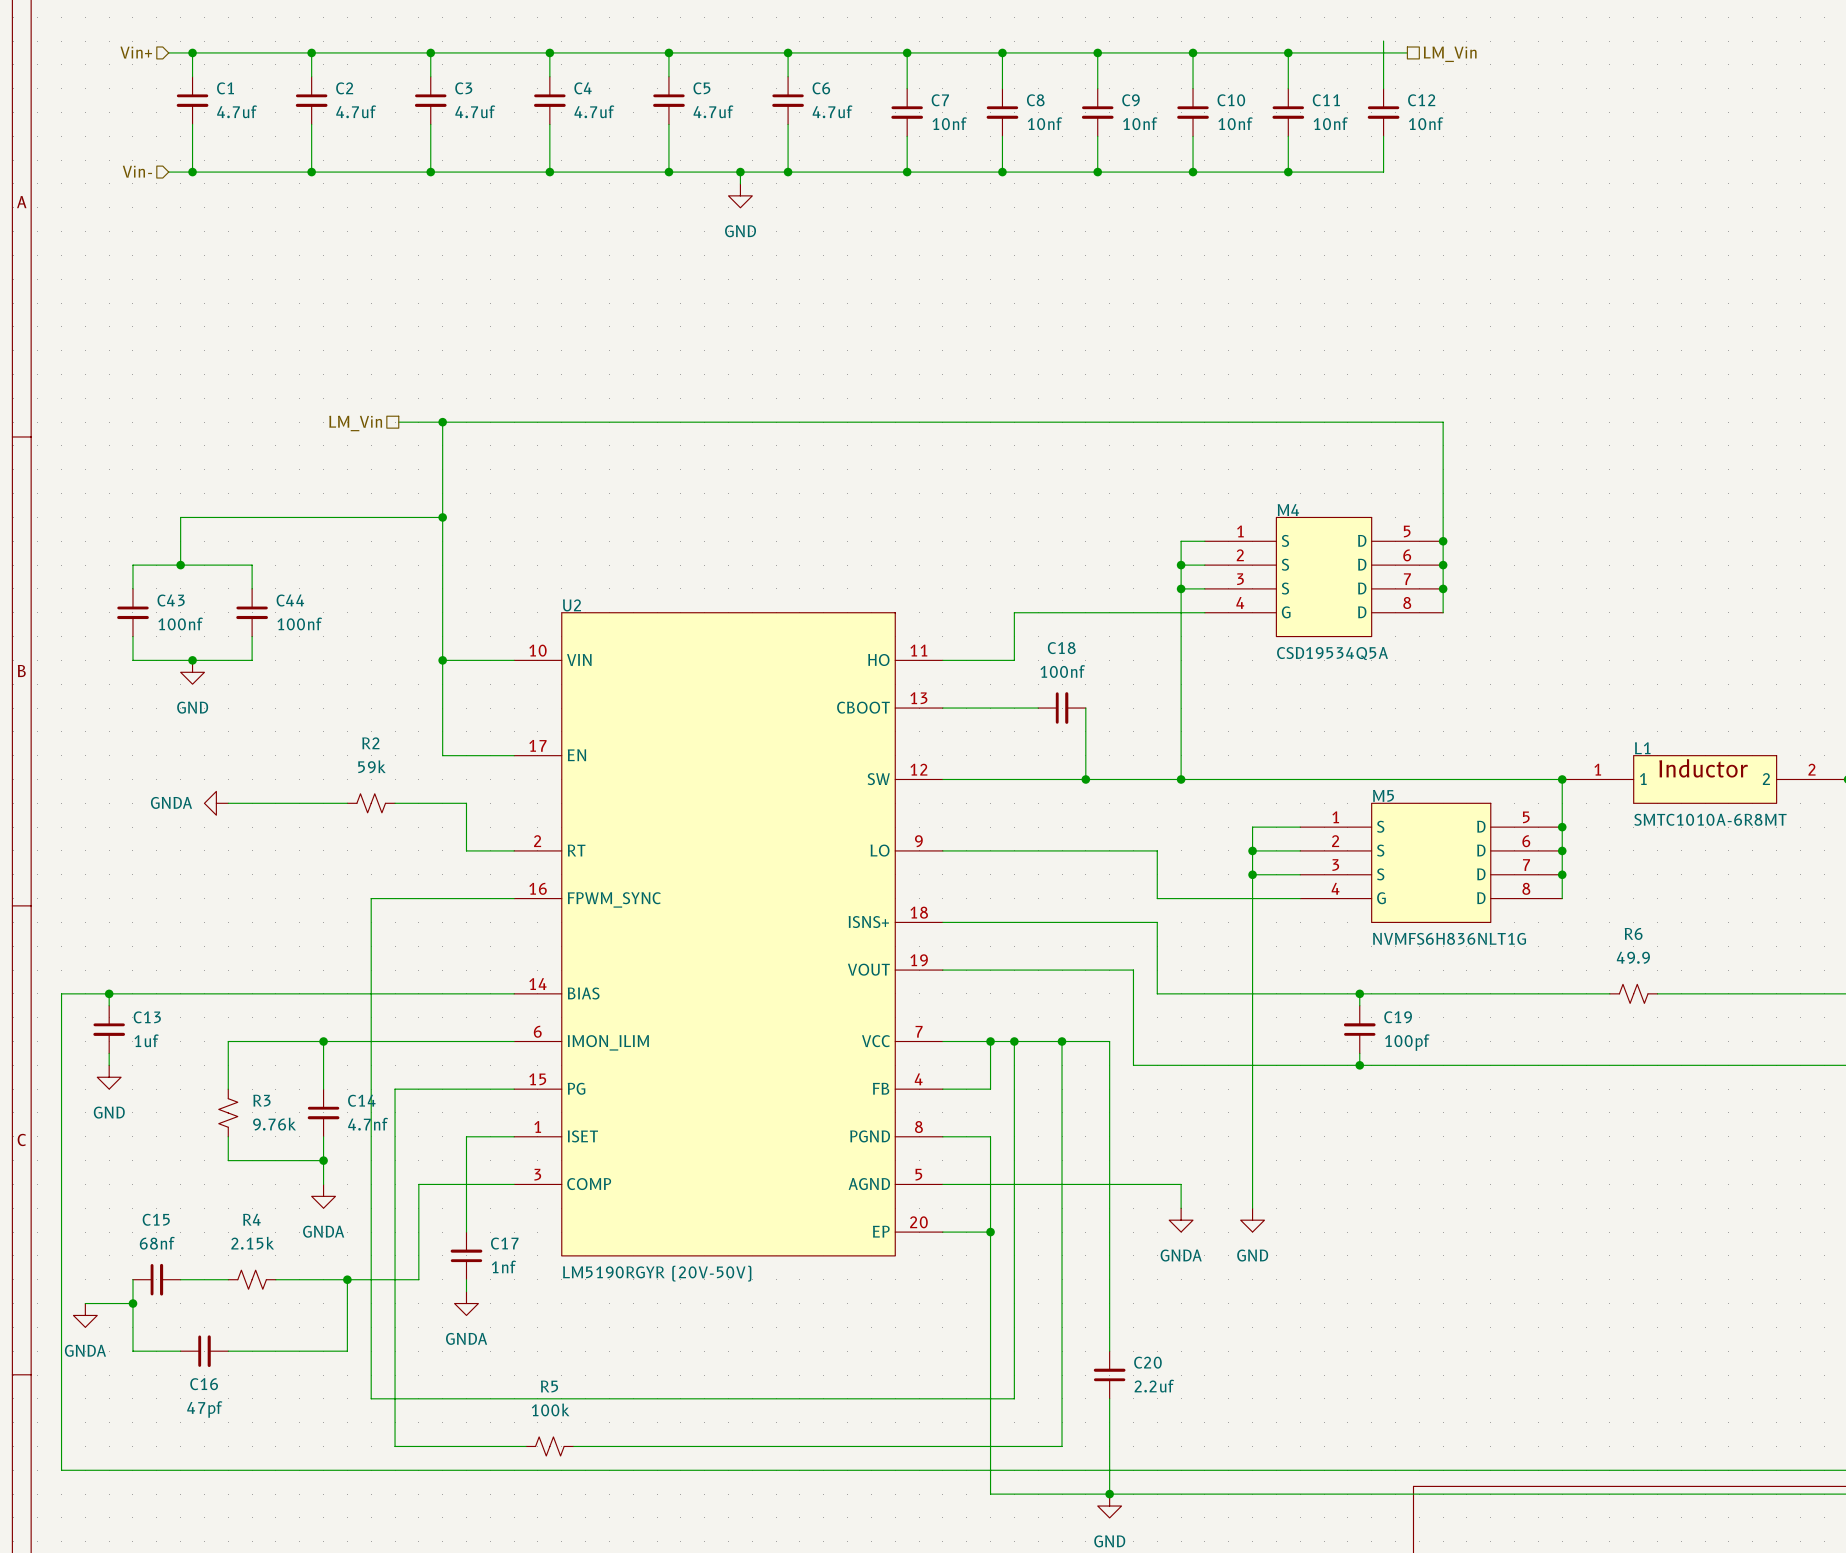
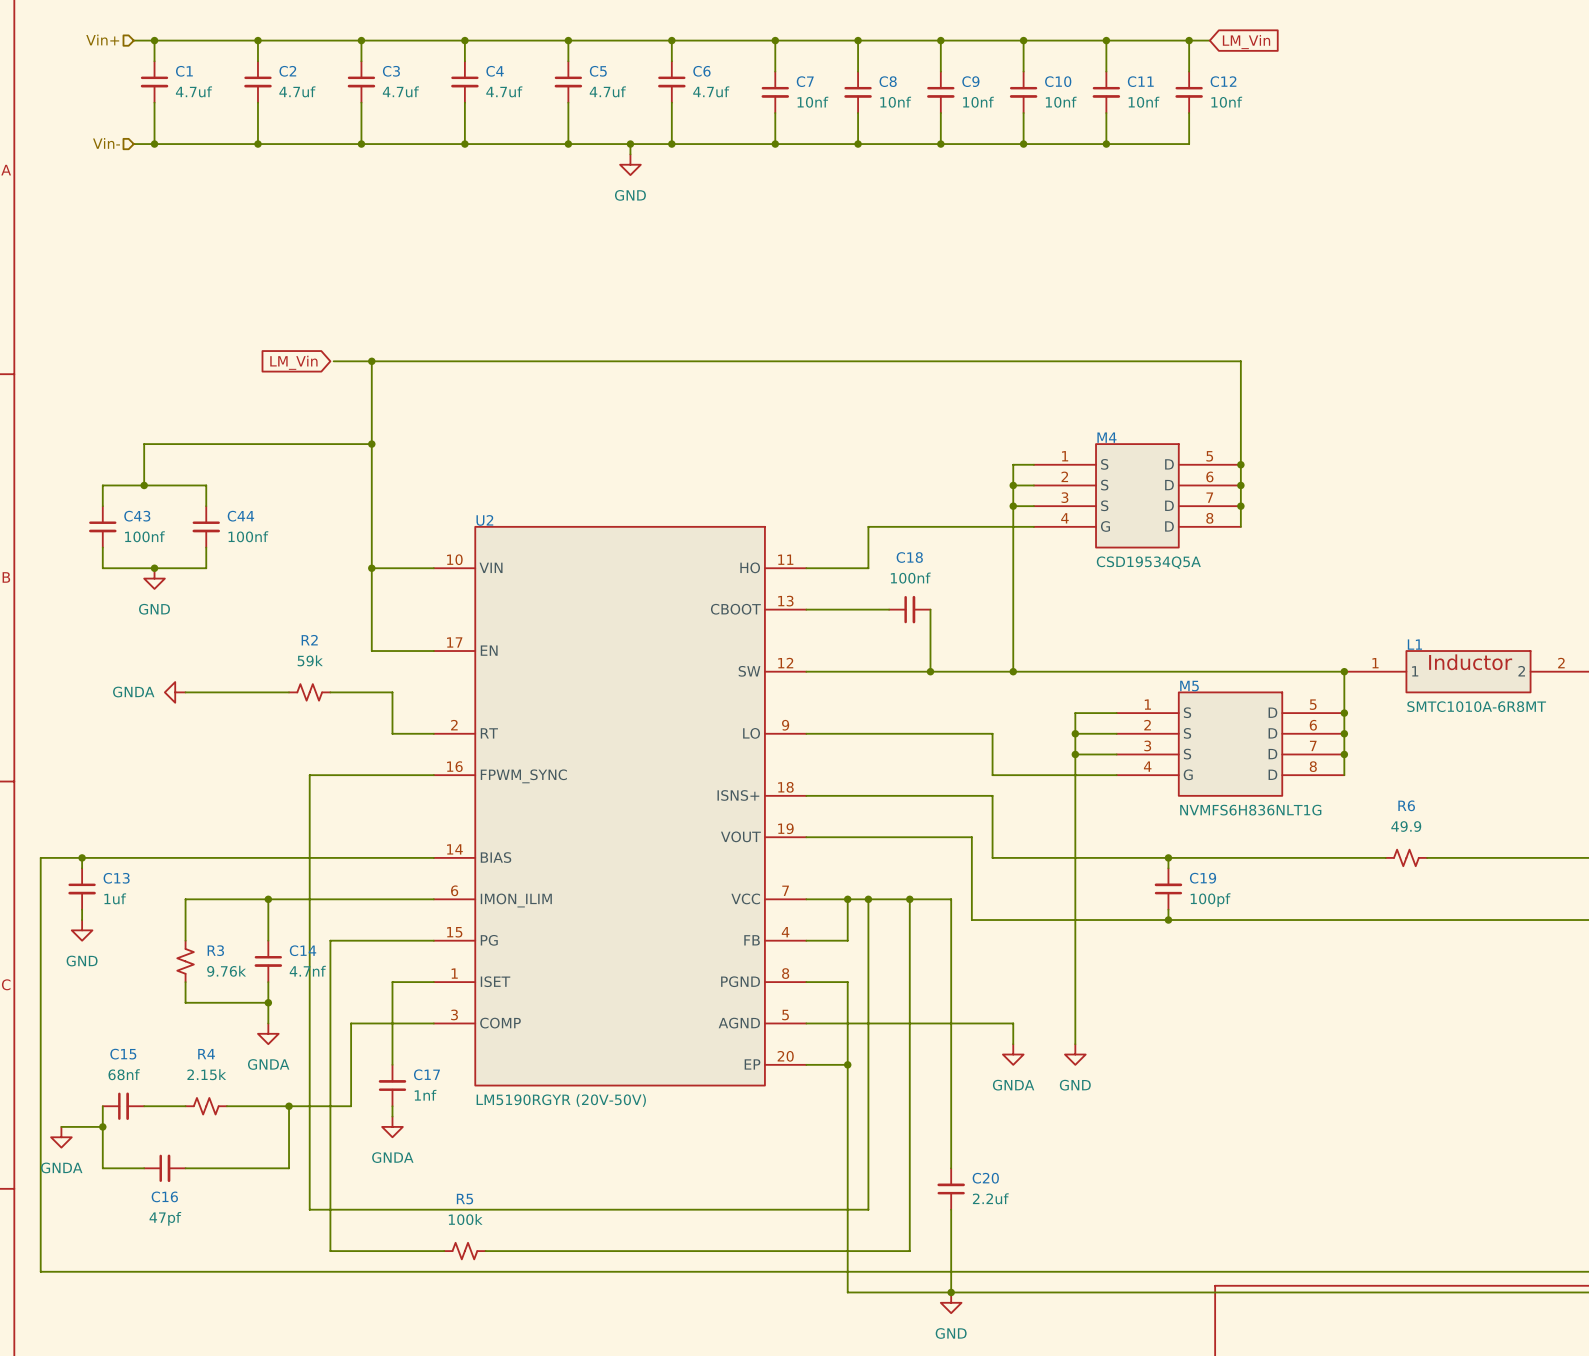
wire: (1383, 41) (1383, 52) -> none
junction: none -> (1189, 40)
global label: none -> LM_Vin (1246, 42)
hierarchical label: LM_Vin (1450, 54) -> none
global label: none -> LM_Vin (293, 362)
hierarchical label: LM_Vin (355, 423) -> none

